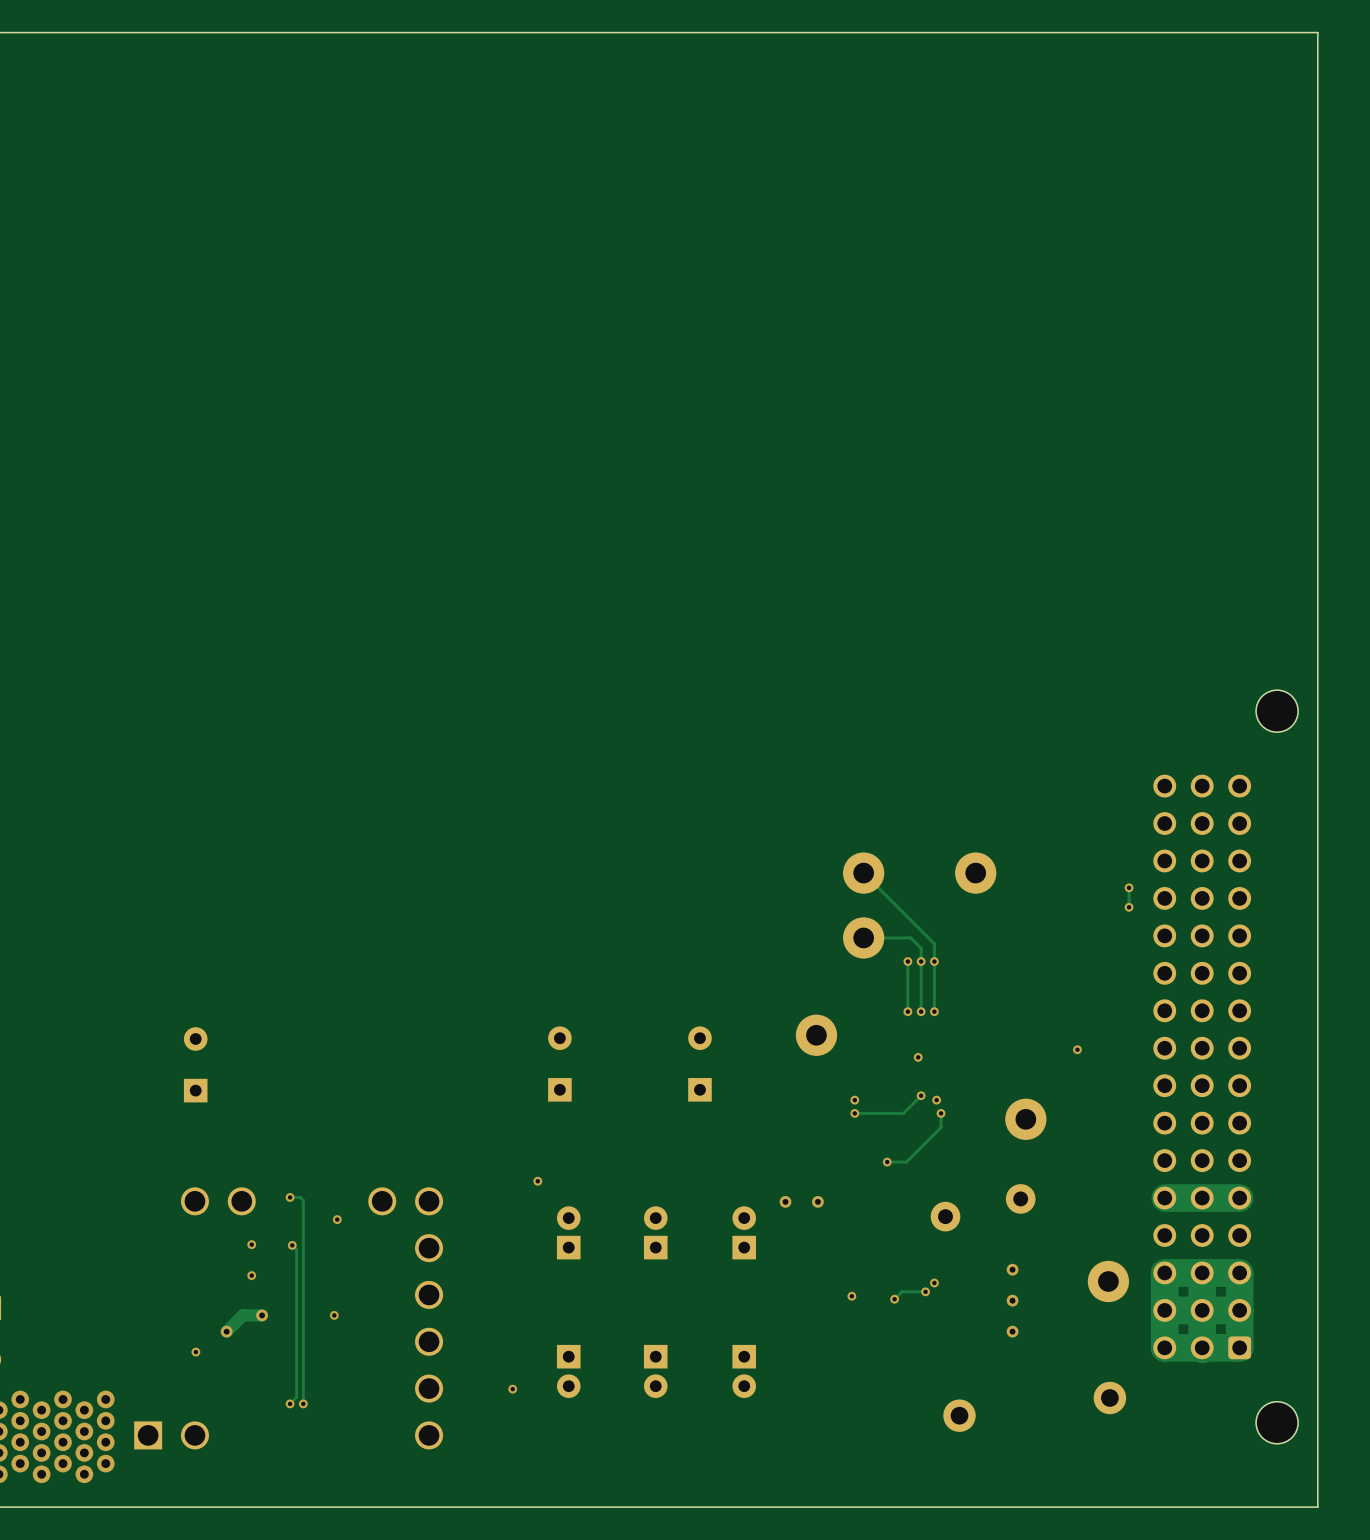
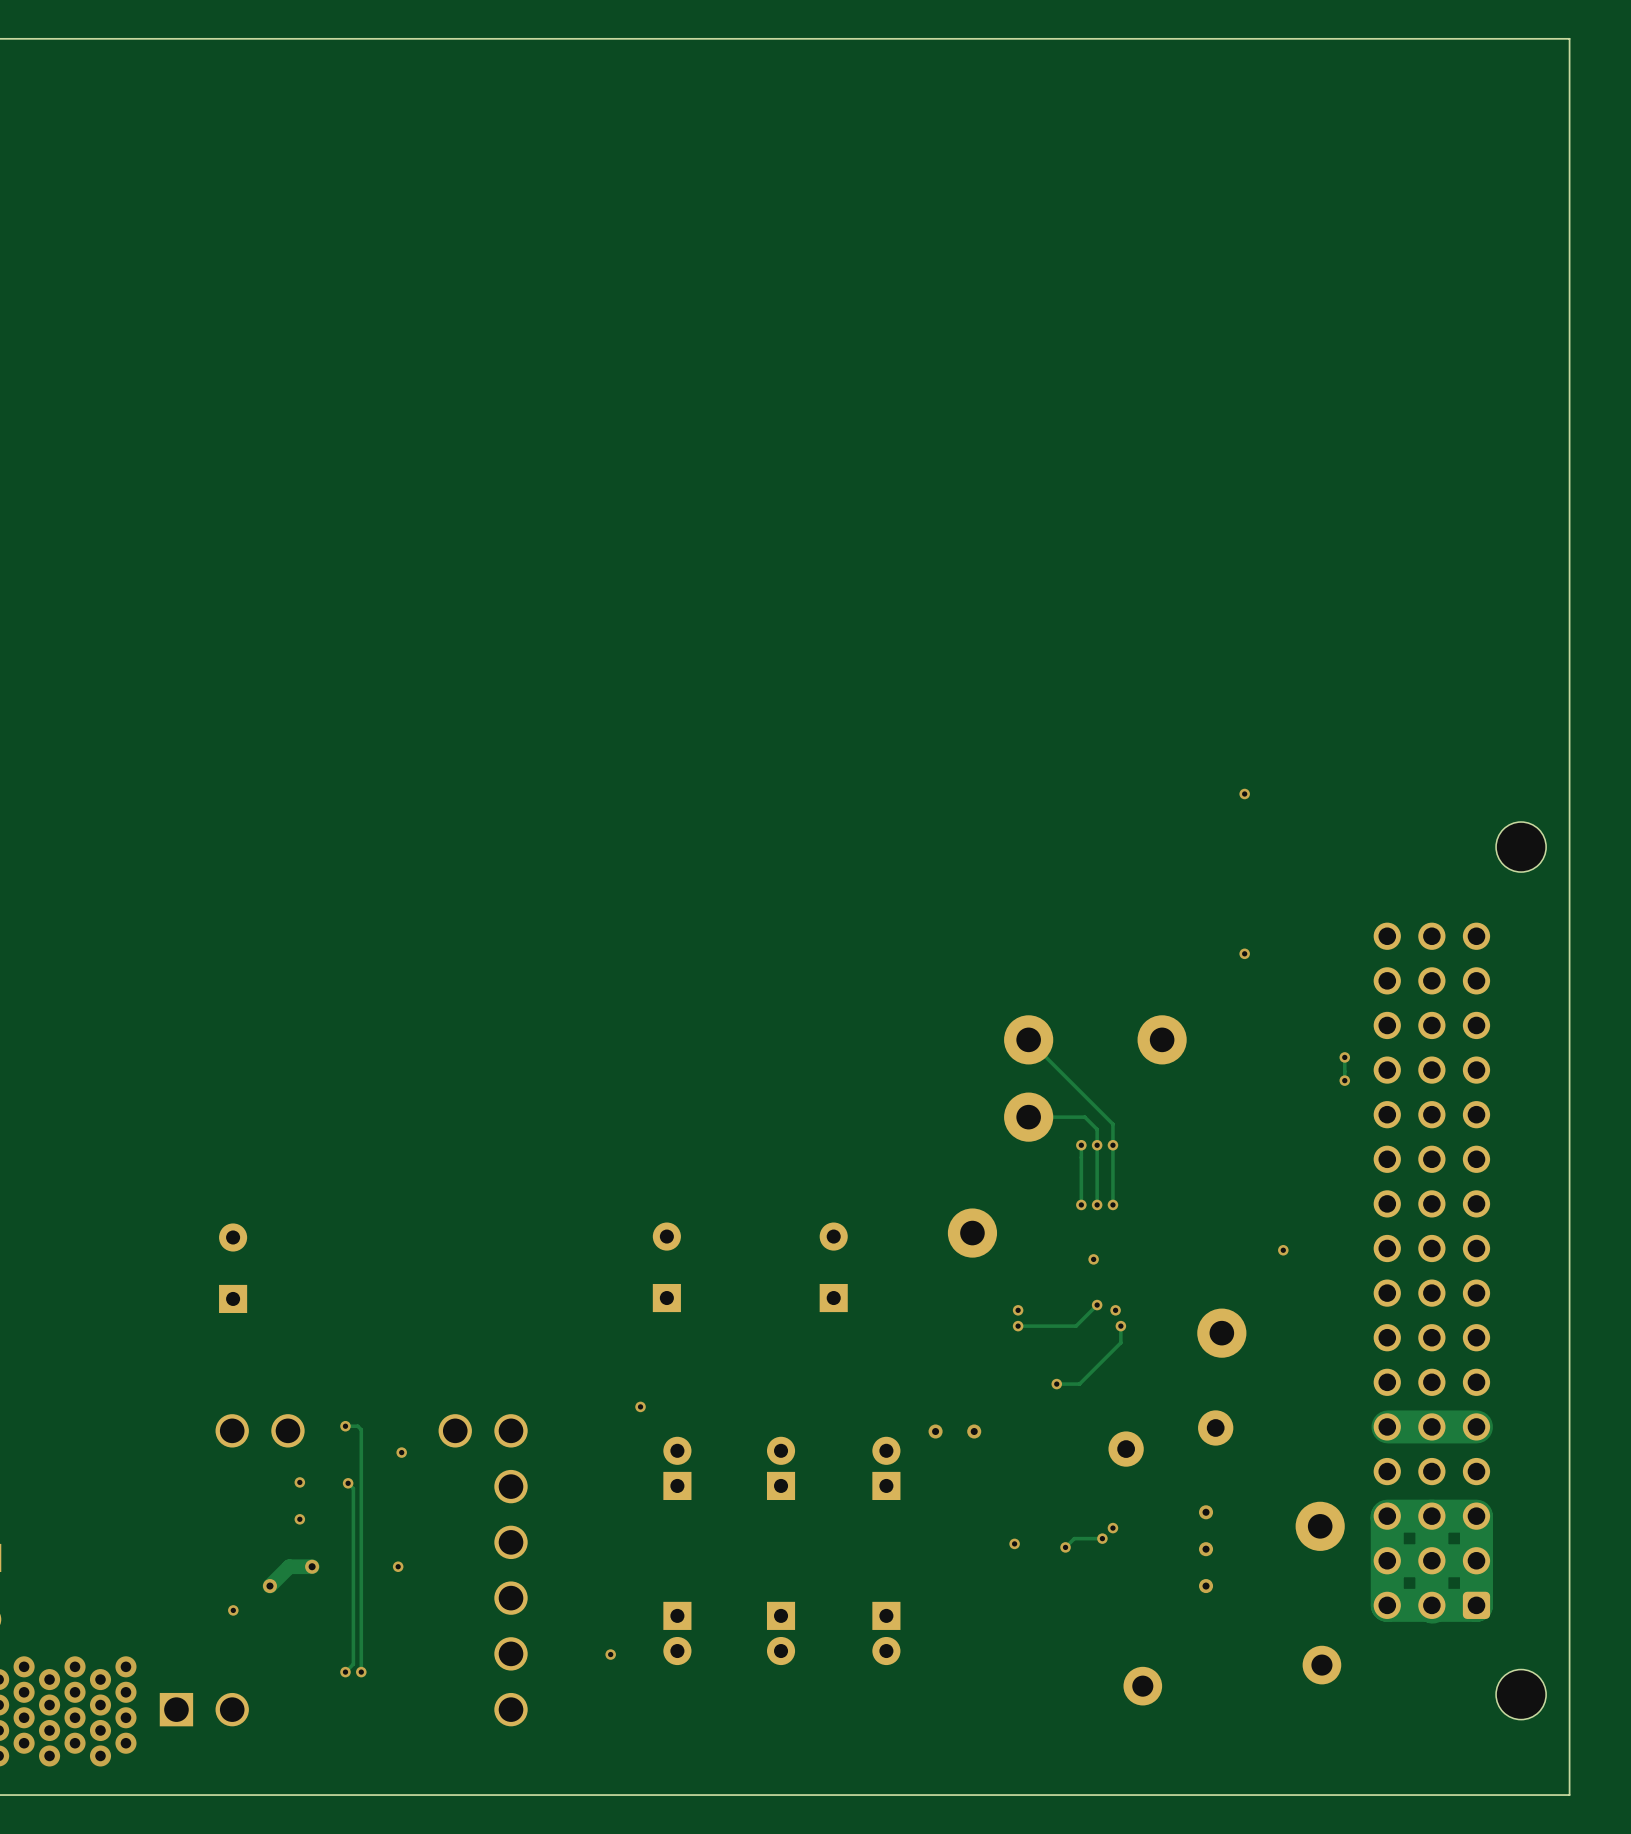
via: none -> (1244, 794)
via: none -> (1244, 953)

